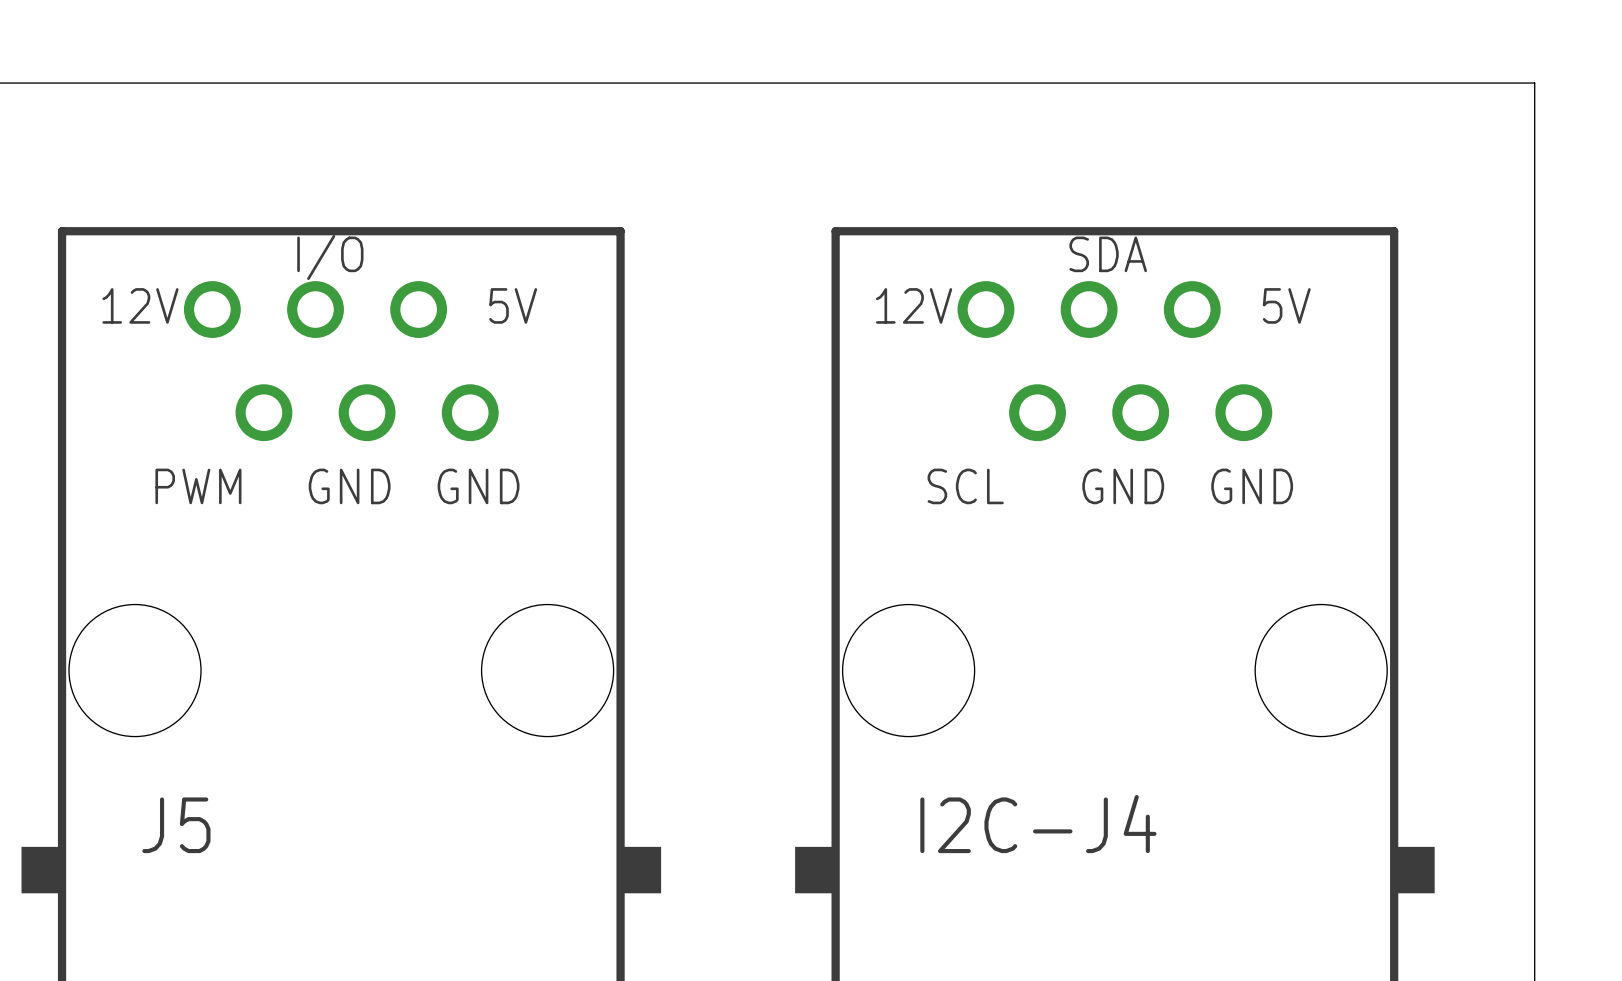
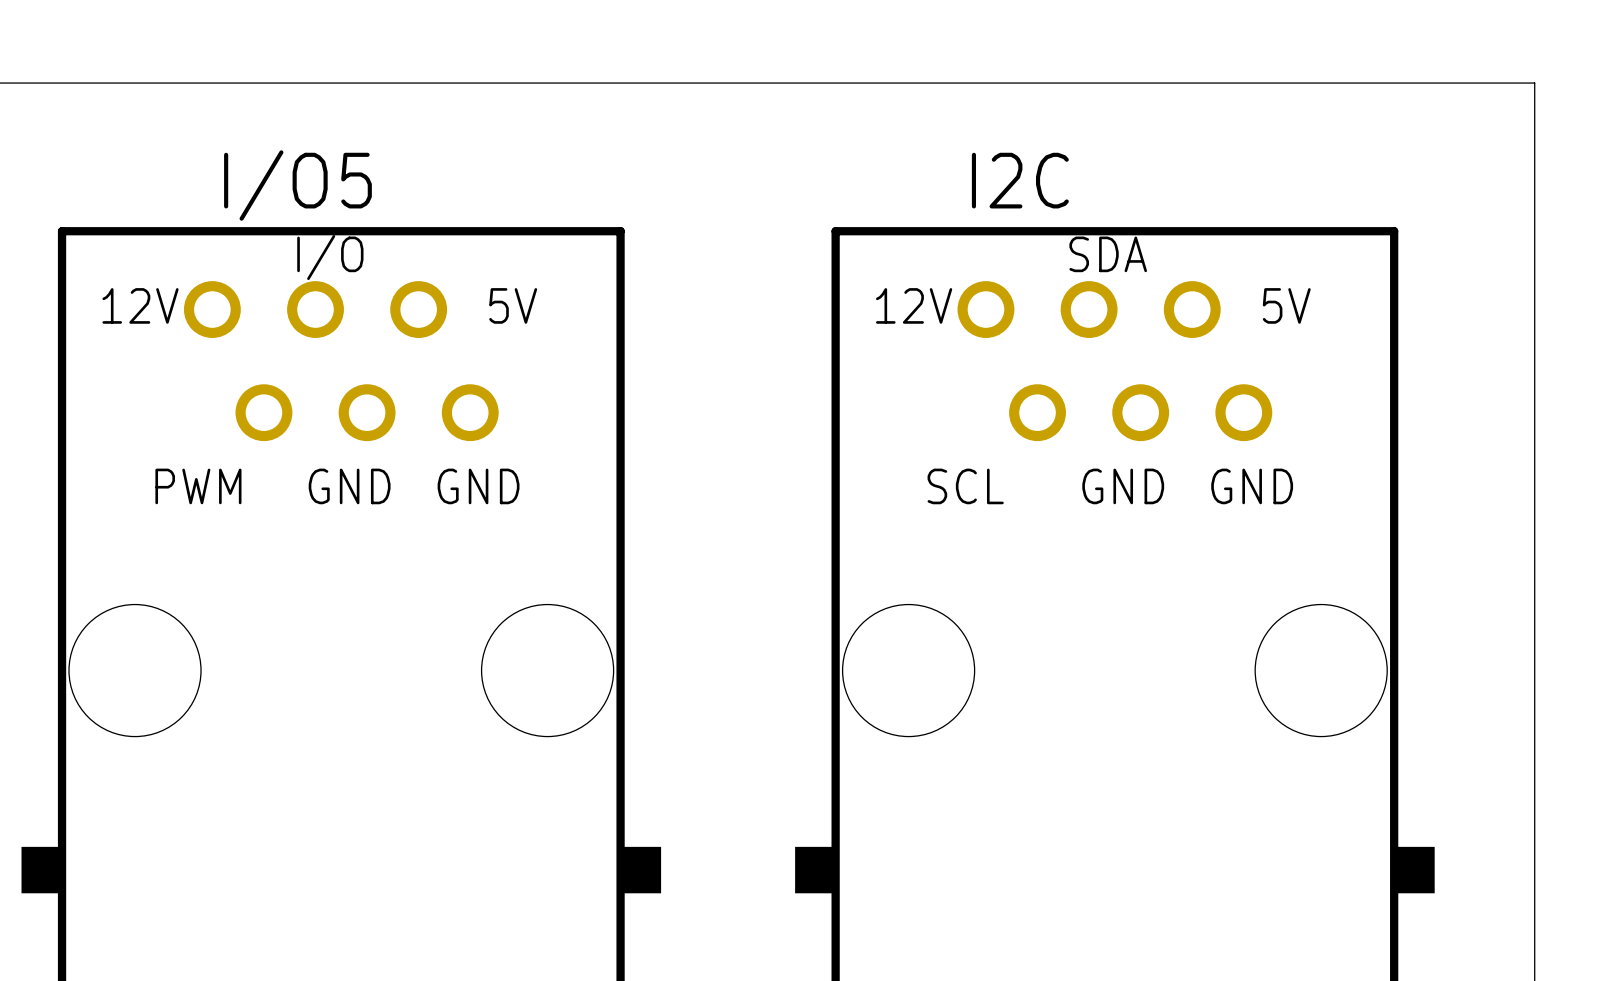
I2C-J4 name: I2C-J4 (1038, 824) -> I2C (1020, 180)
J5 name: J5 (176, 825) -> I/O5 (297, 185)

